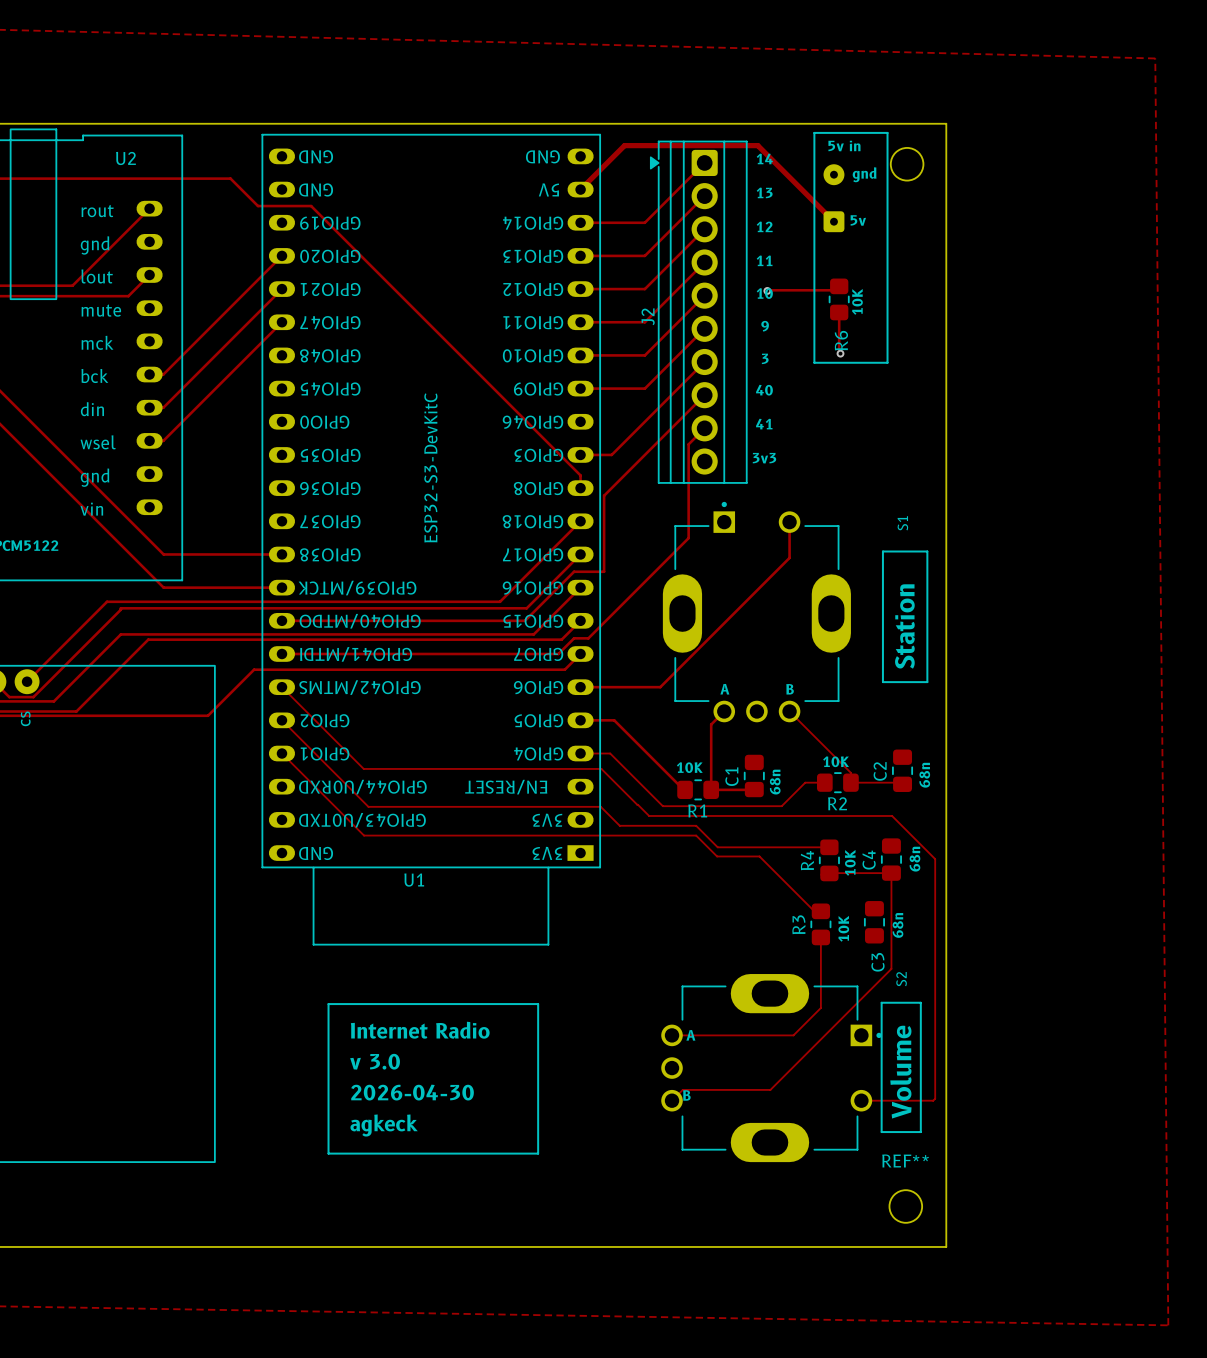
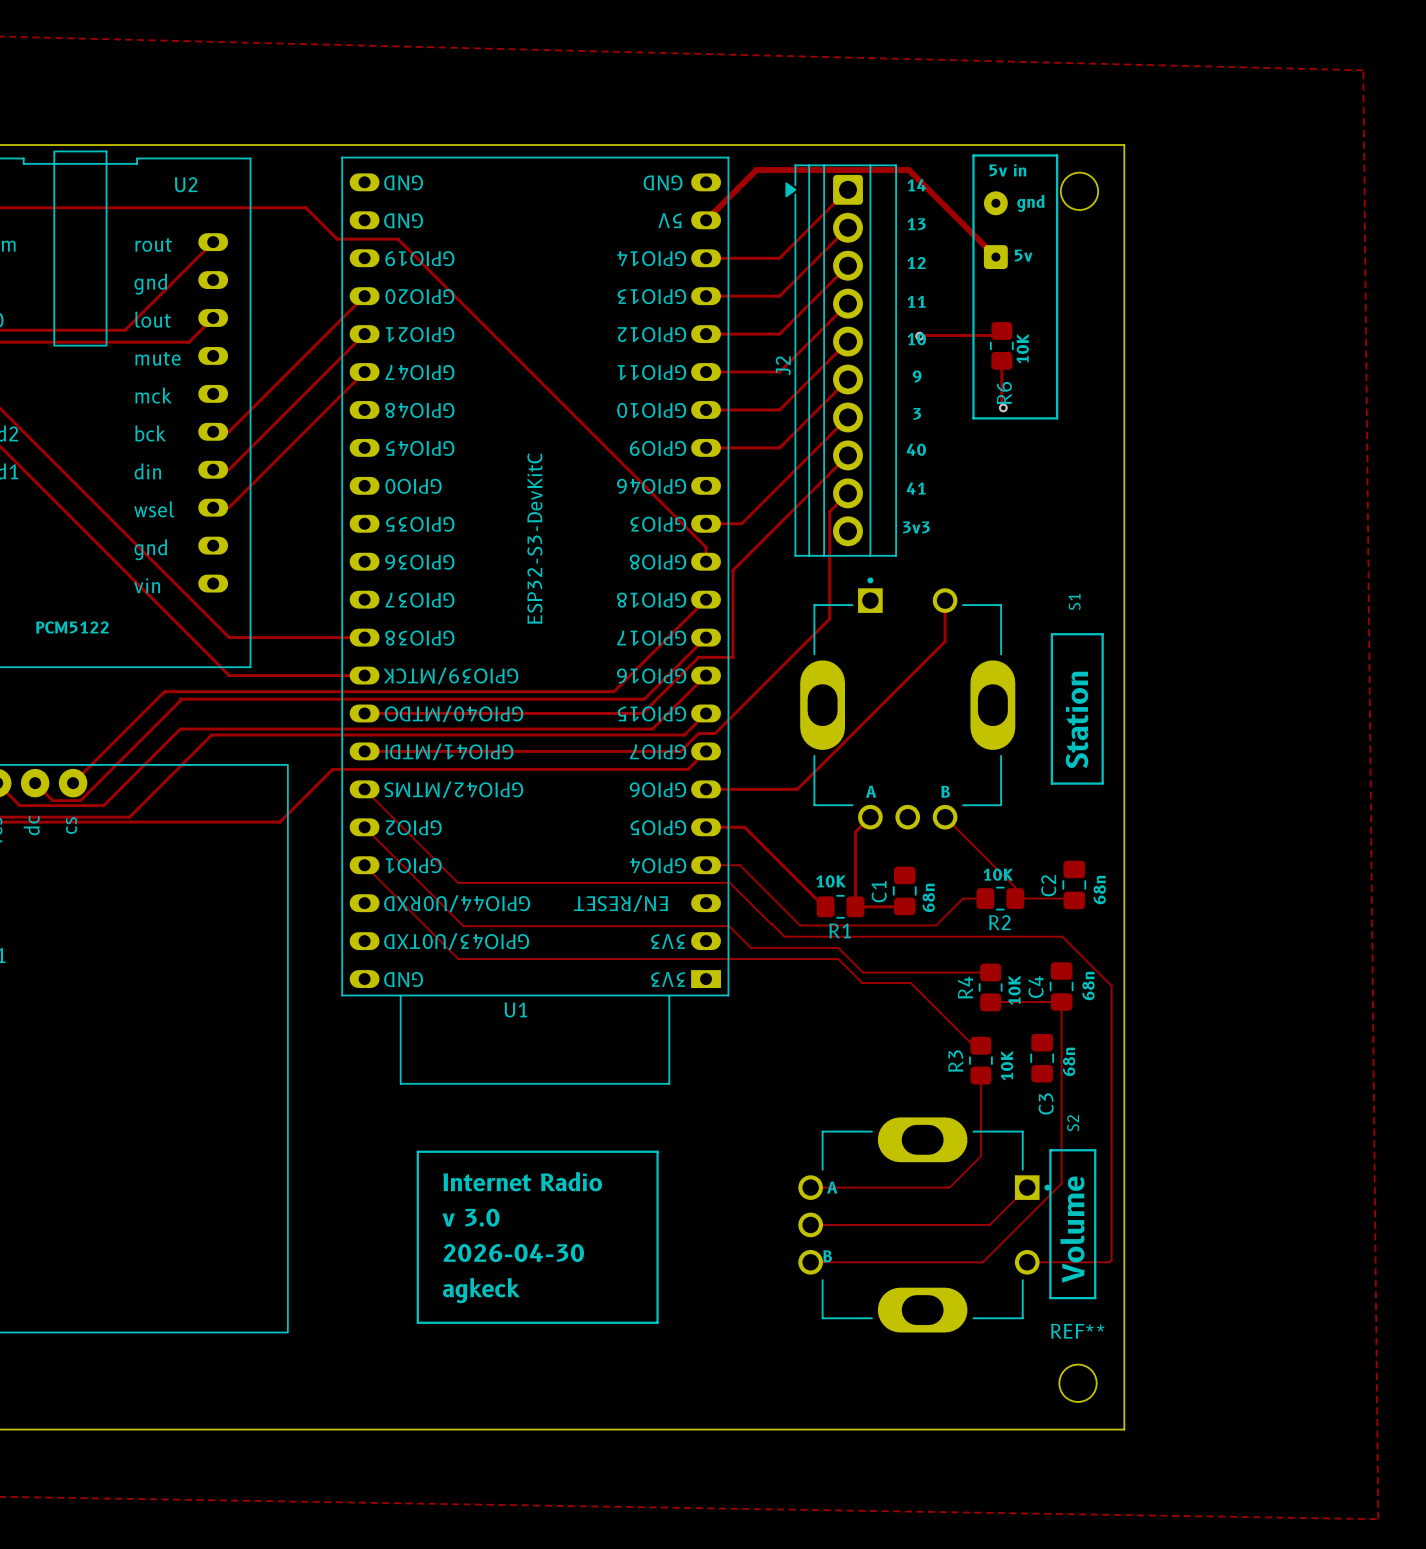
track: (891, 968) (770, 1089) (682, 1089) (672, 1100) -> (1061, 1111) (1061, 1183) (982, 1262) (810, 1262)
track: none -> (1027, 1187) (989, 1224) (810, 1224)

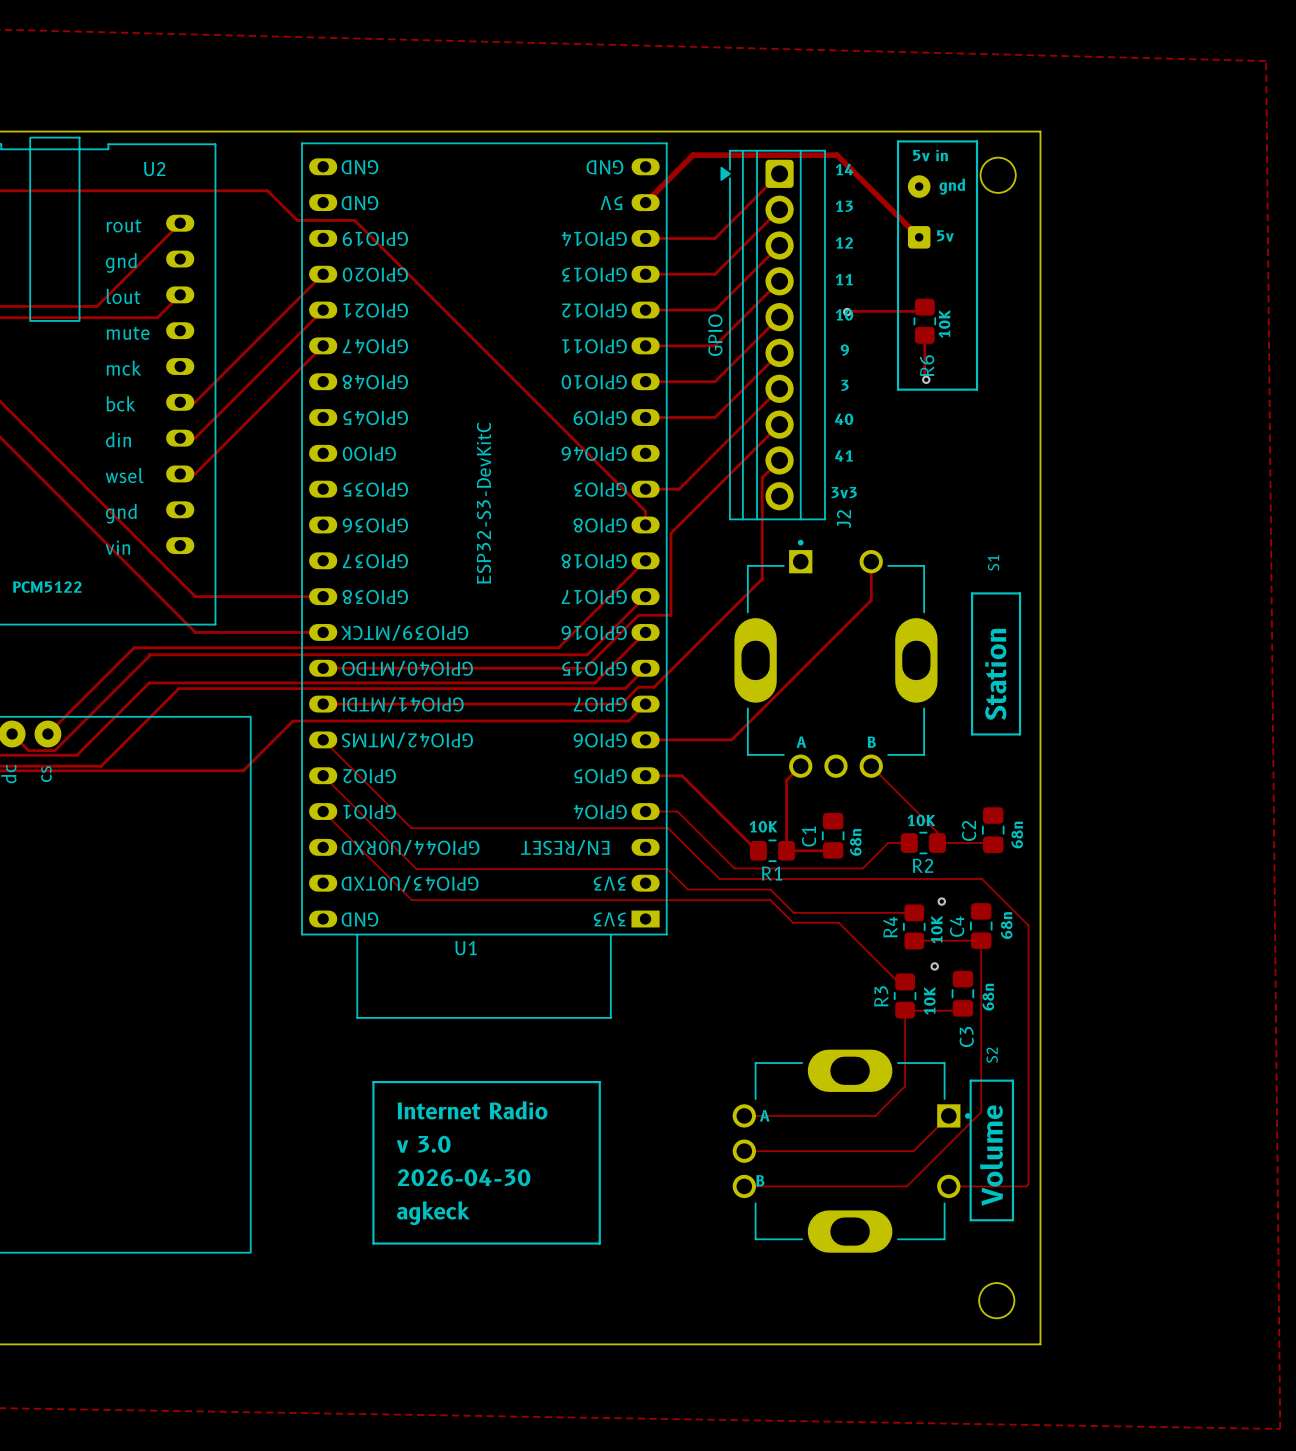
J2 value: none -> GPIO (715, 335)
J2 name position: J2 (783, 365) -> J2 (844, 519)
via: none -> (941, 901)
via: none -> (934, 966)
track: none -> (905, 1010) (964, 1010)
REF** name: REF** (1077, 1331) -> none

